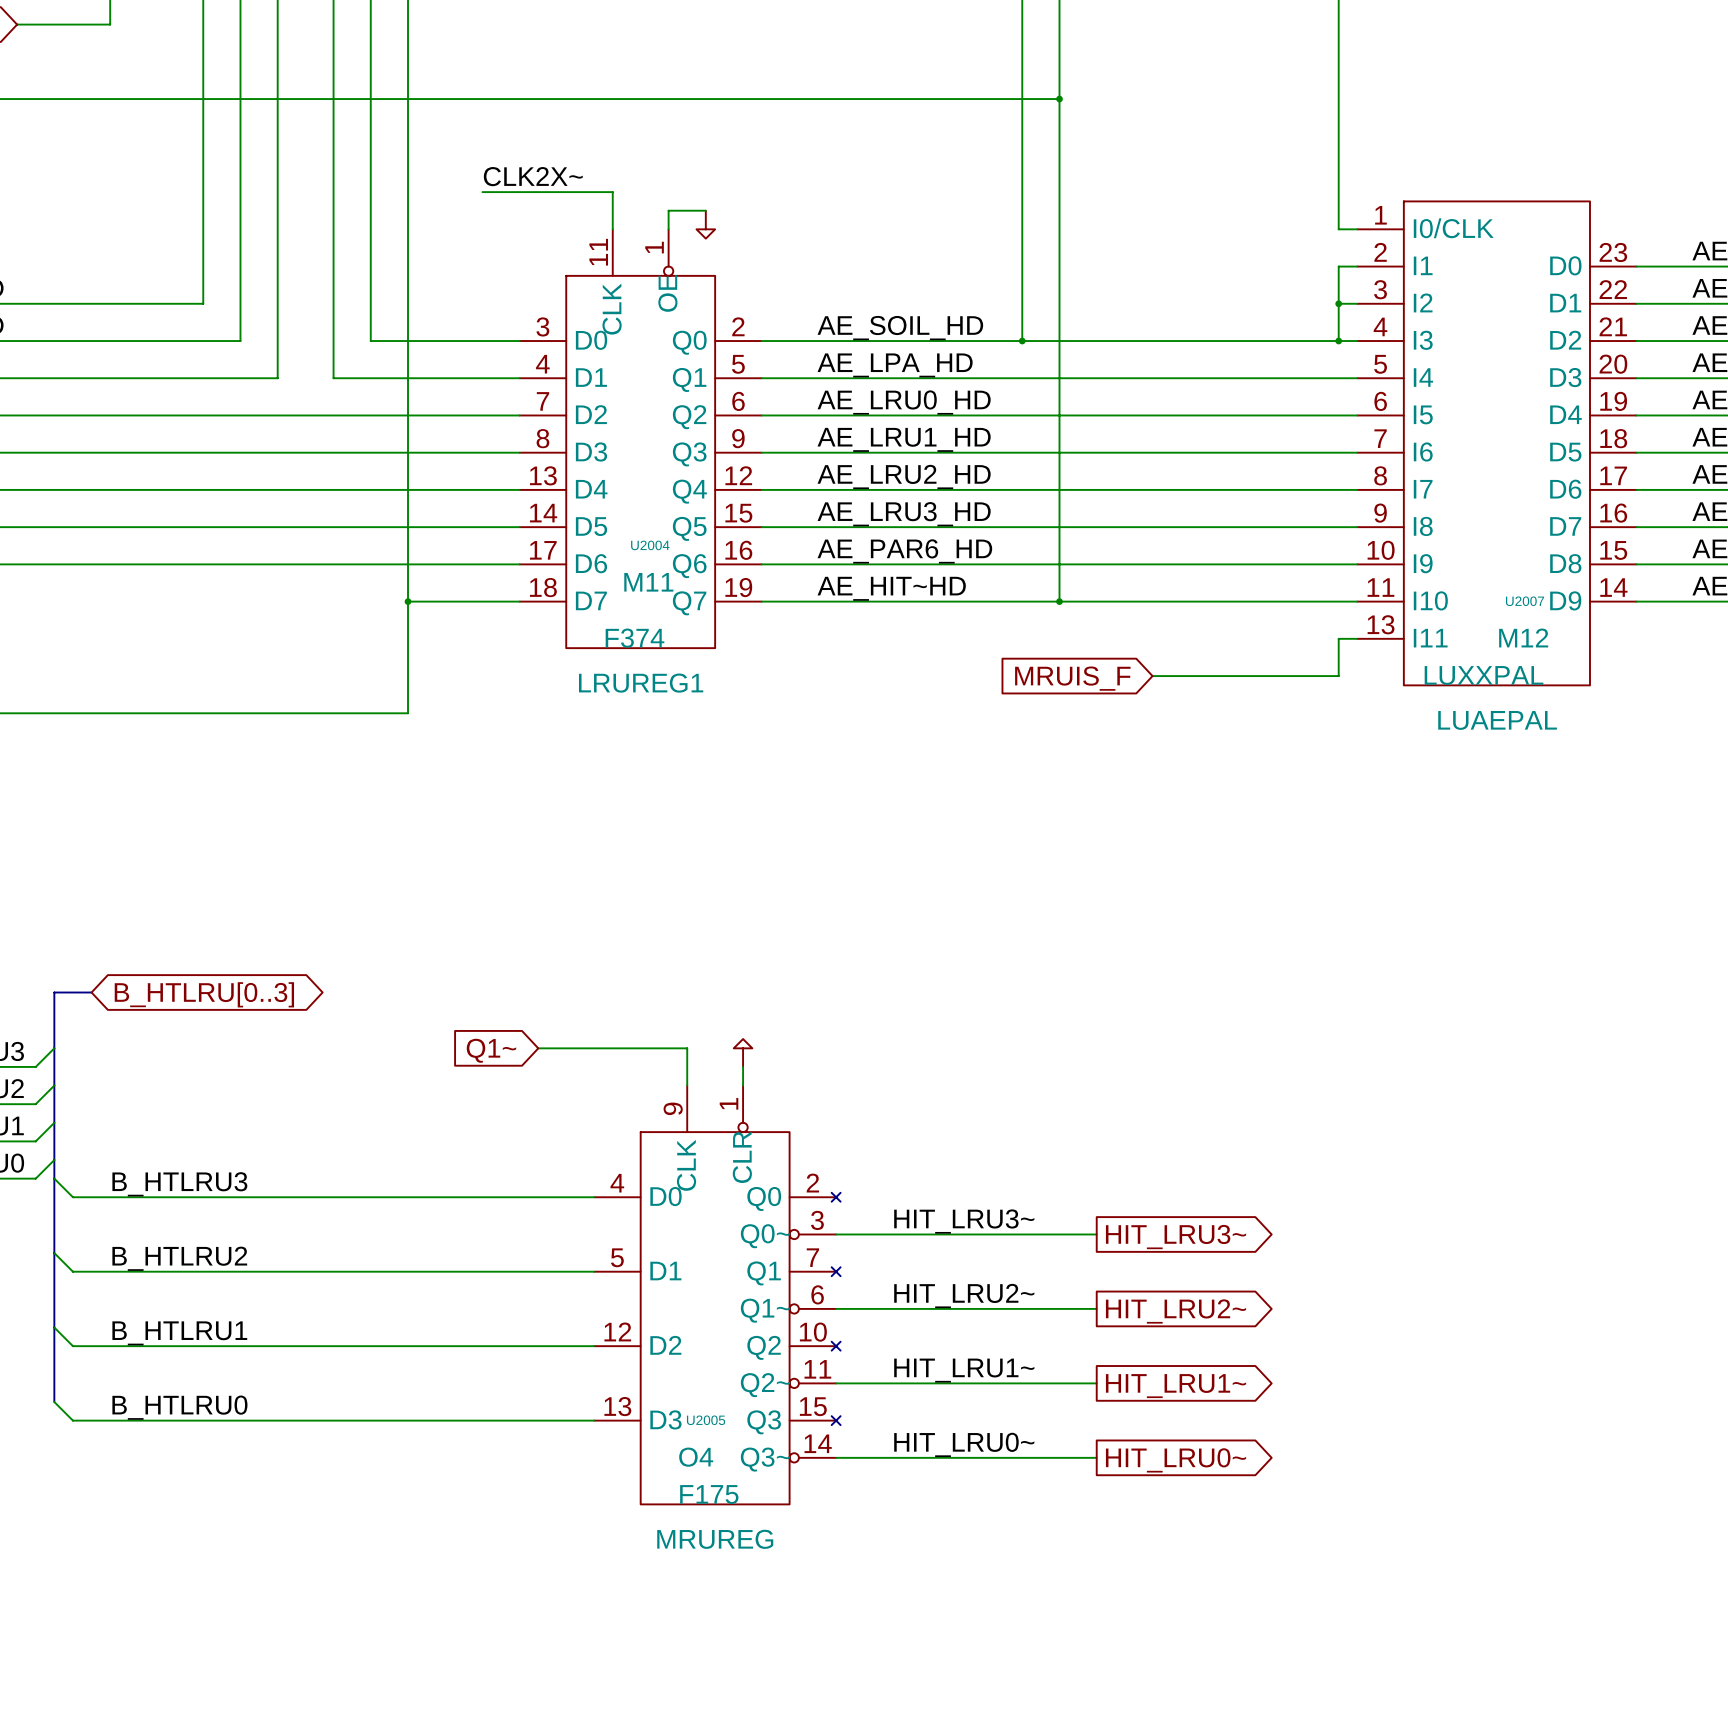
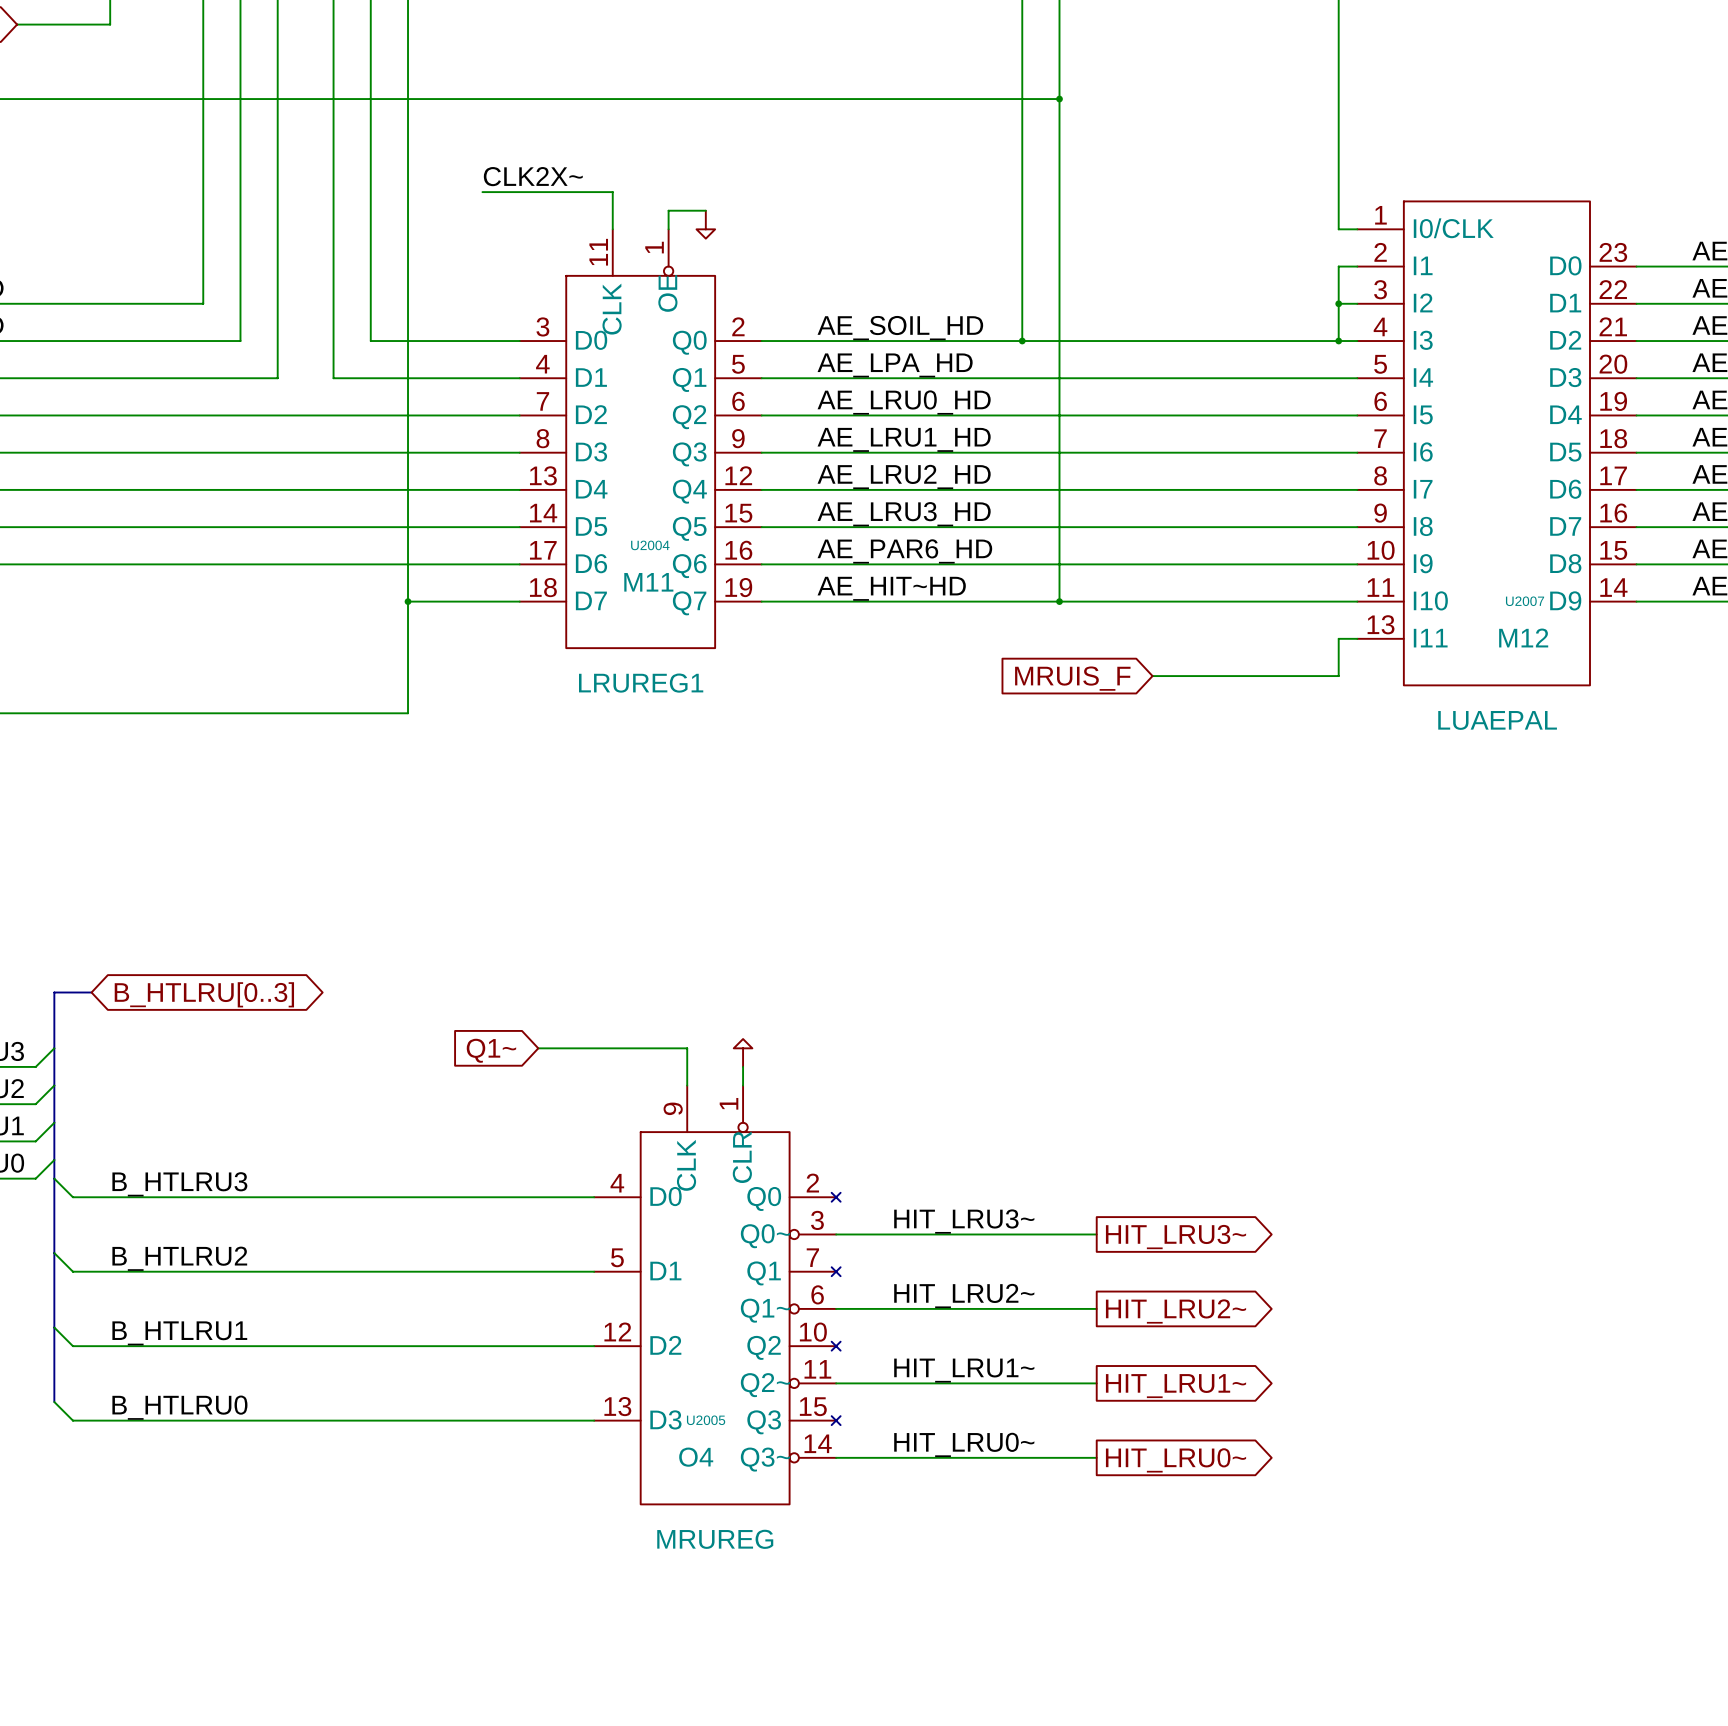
U2004 value: F374 (635, 638) -> none
U2007 value: LUXXPAL (1484, 675) -> none
U2005 value: F175 (709, 1494) -> none

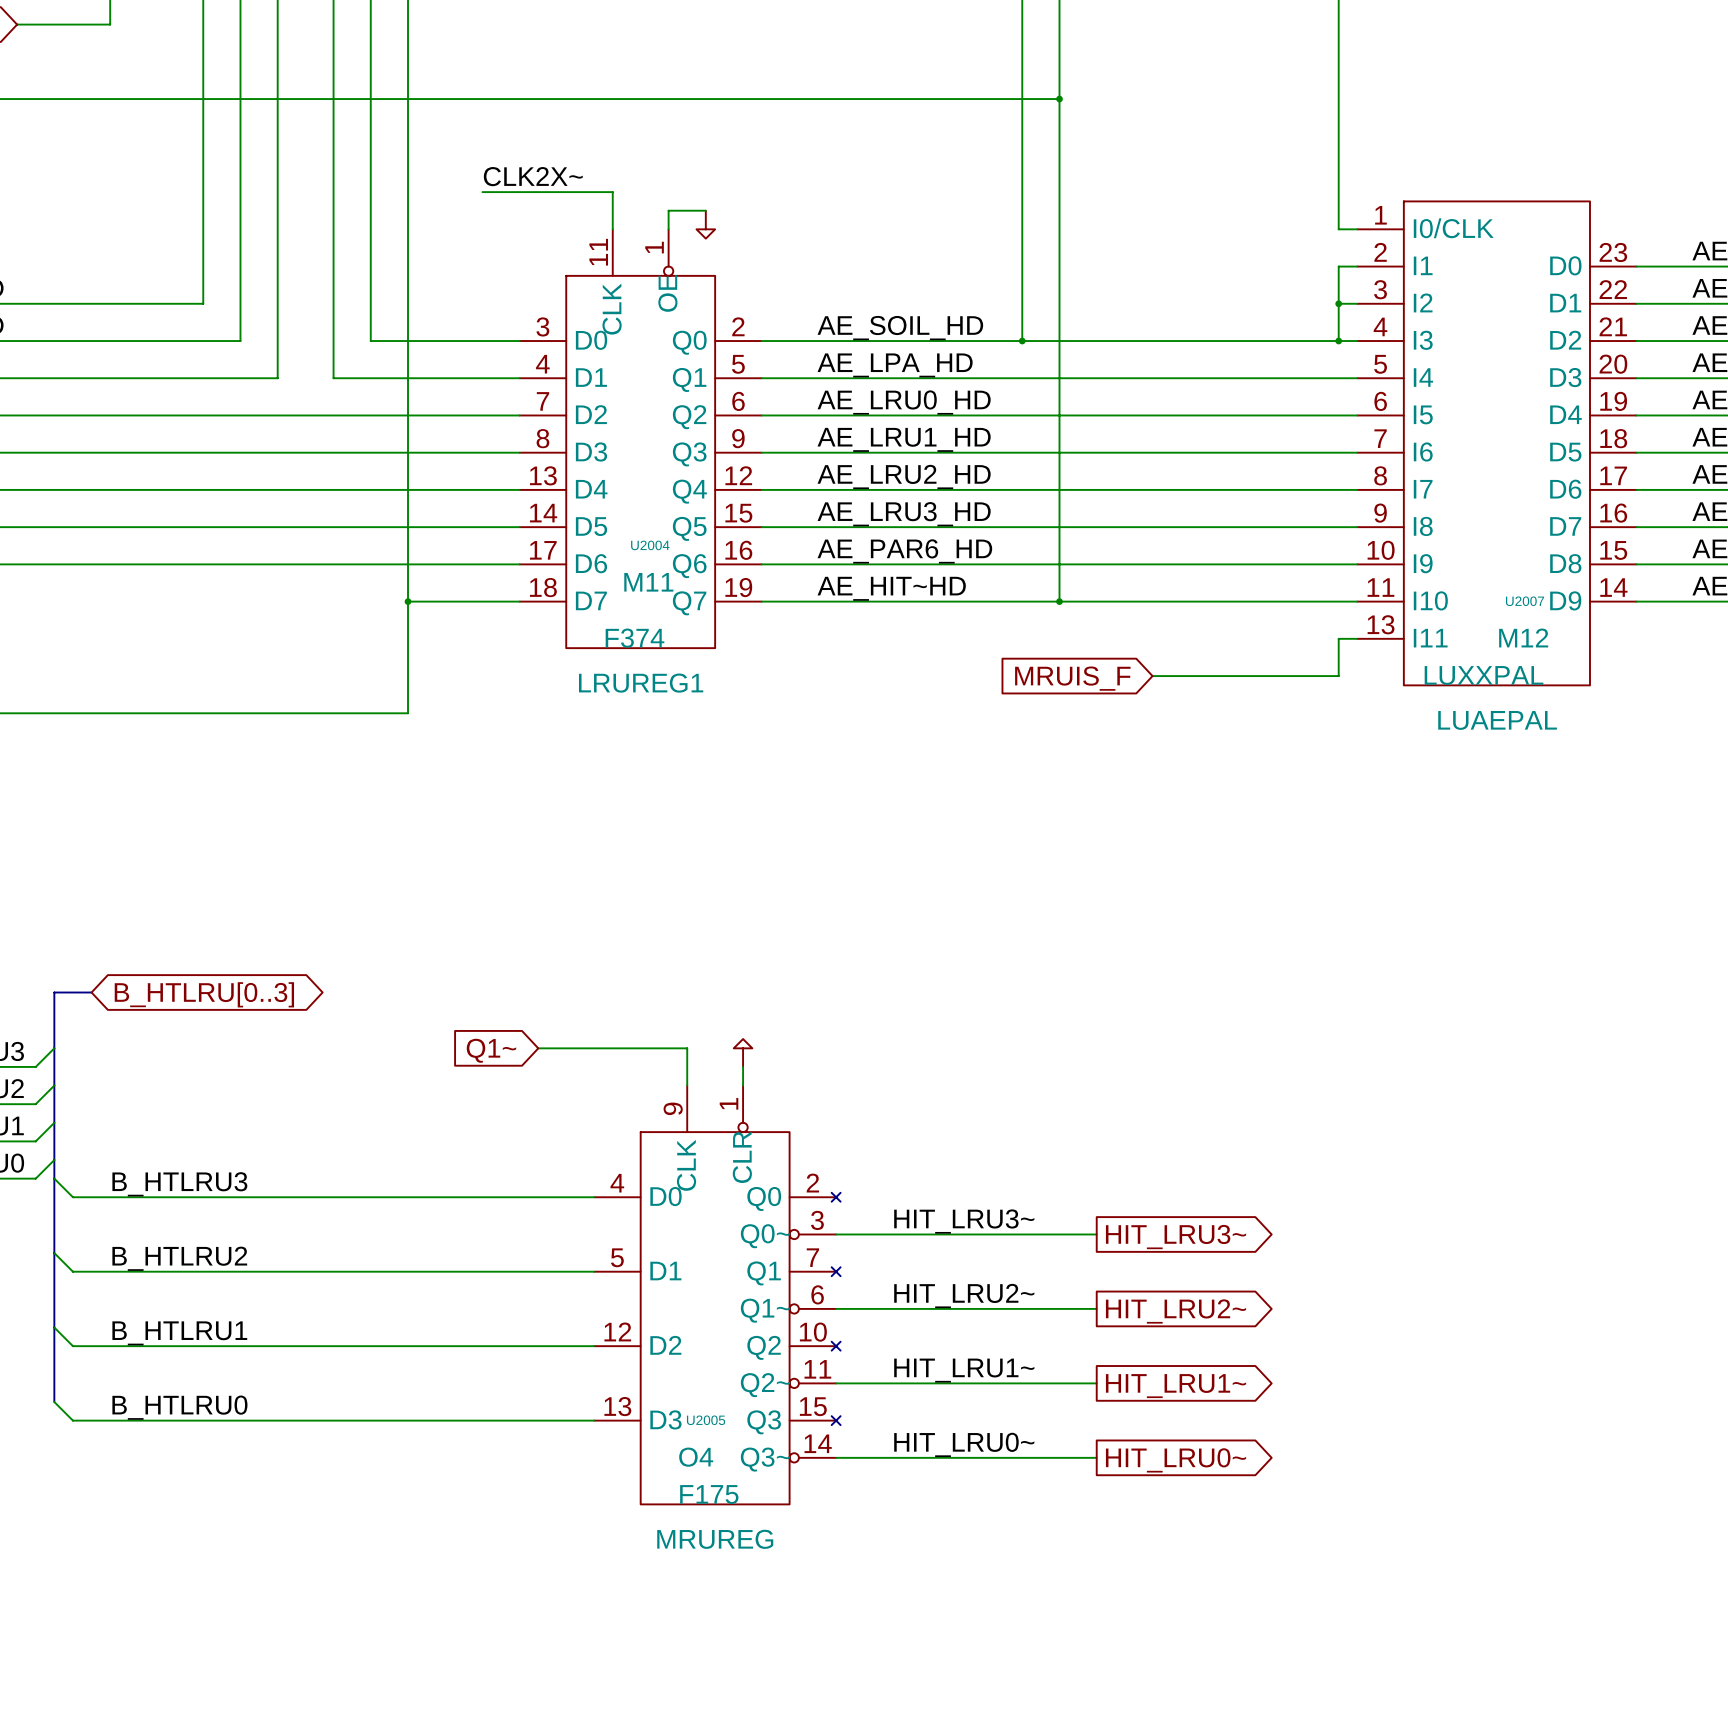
U2004 value: none -> F374 (635, 638)
U2007 value: none -> LUXXPAL (1484, 675)
U2005 value: none -> F175 (709, 1494)

